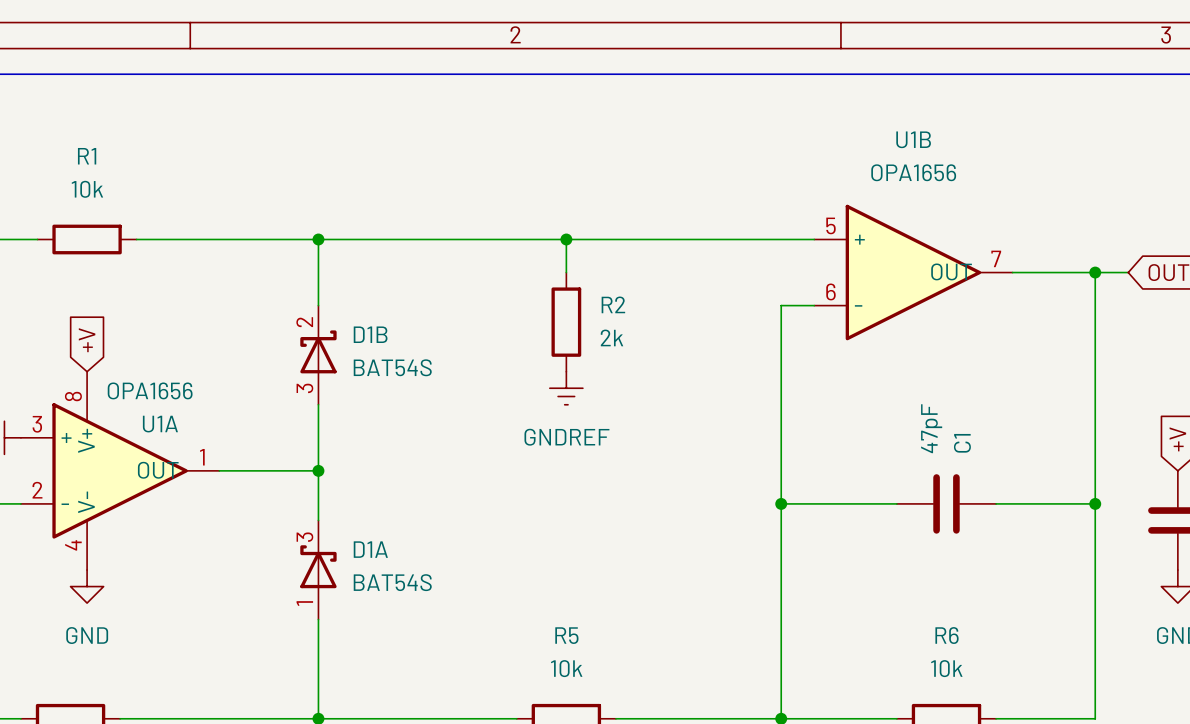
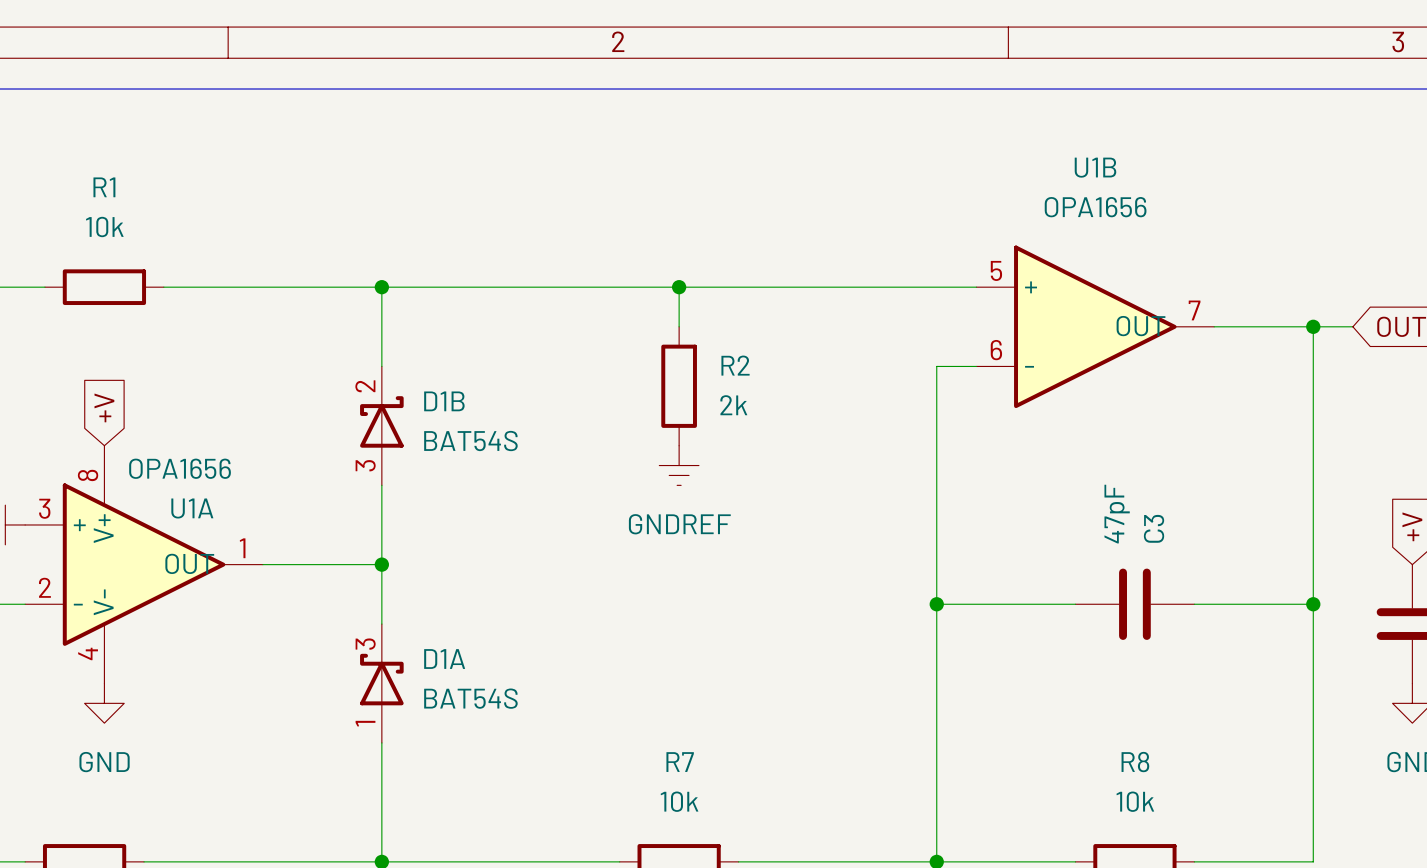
C1 name: C1 (962, 443) -> C3 (1154, 528)
R5 name: R5 (566, 635) -> R7 (680, 762)
R6 name: R6 (947, 635) -> R8 (1135, 762)

